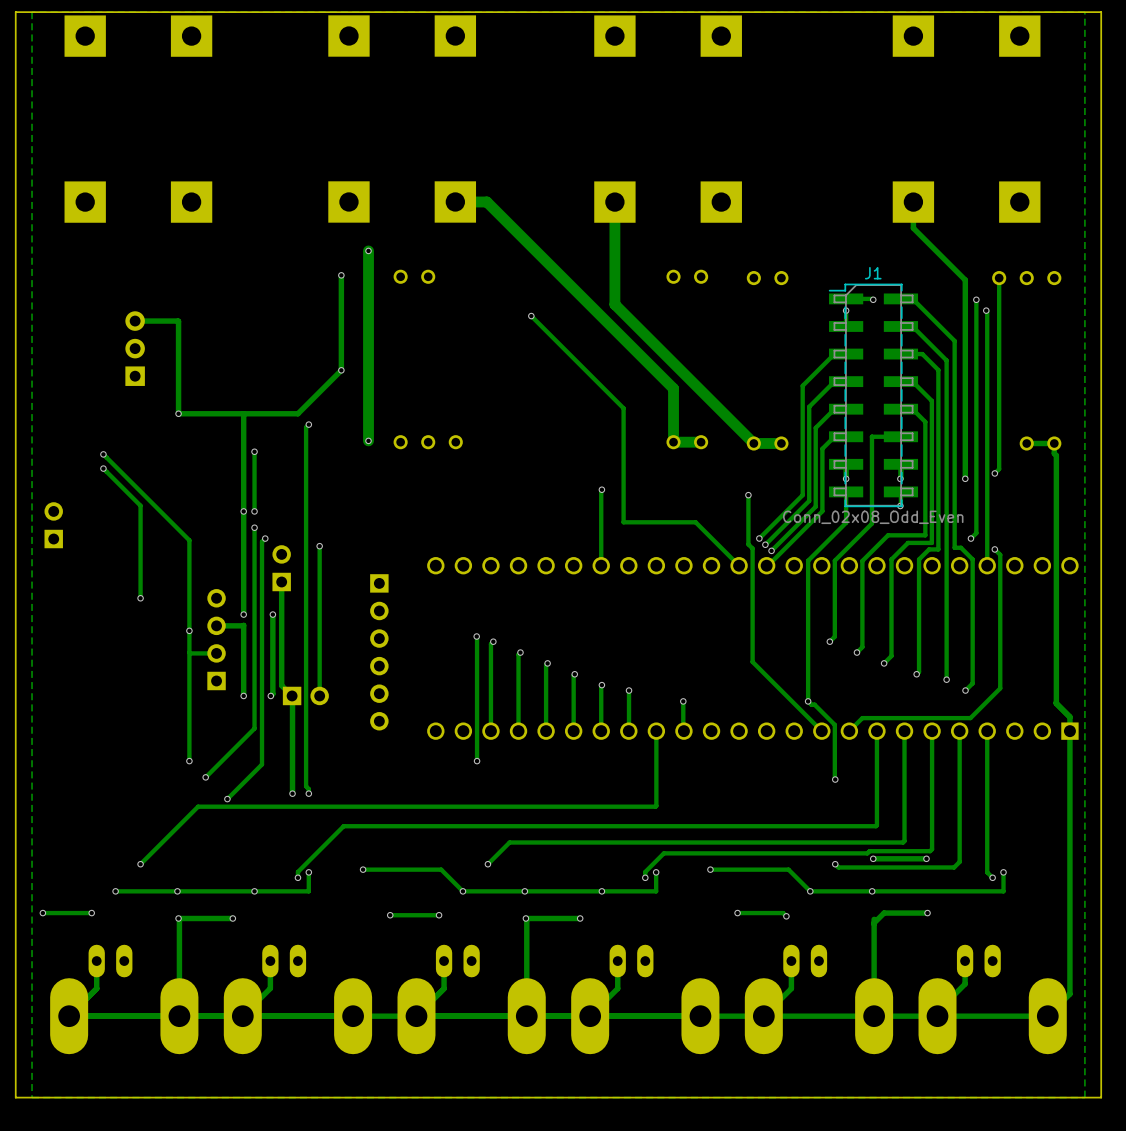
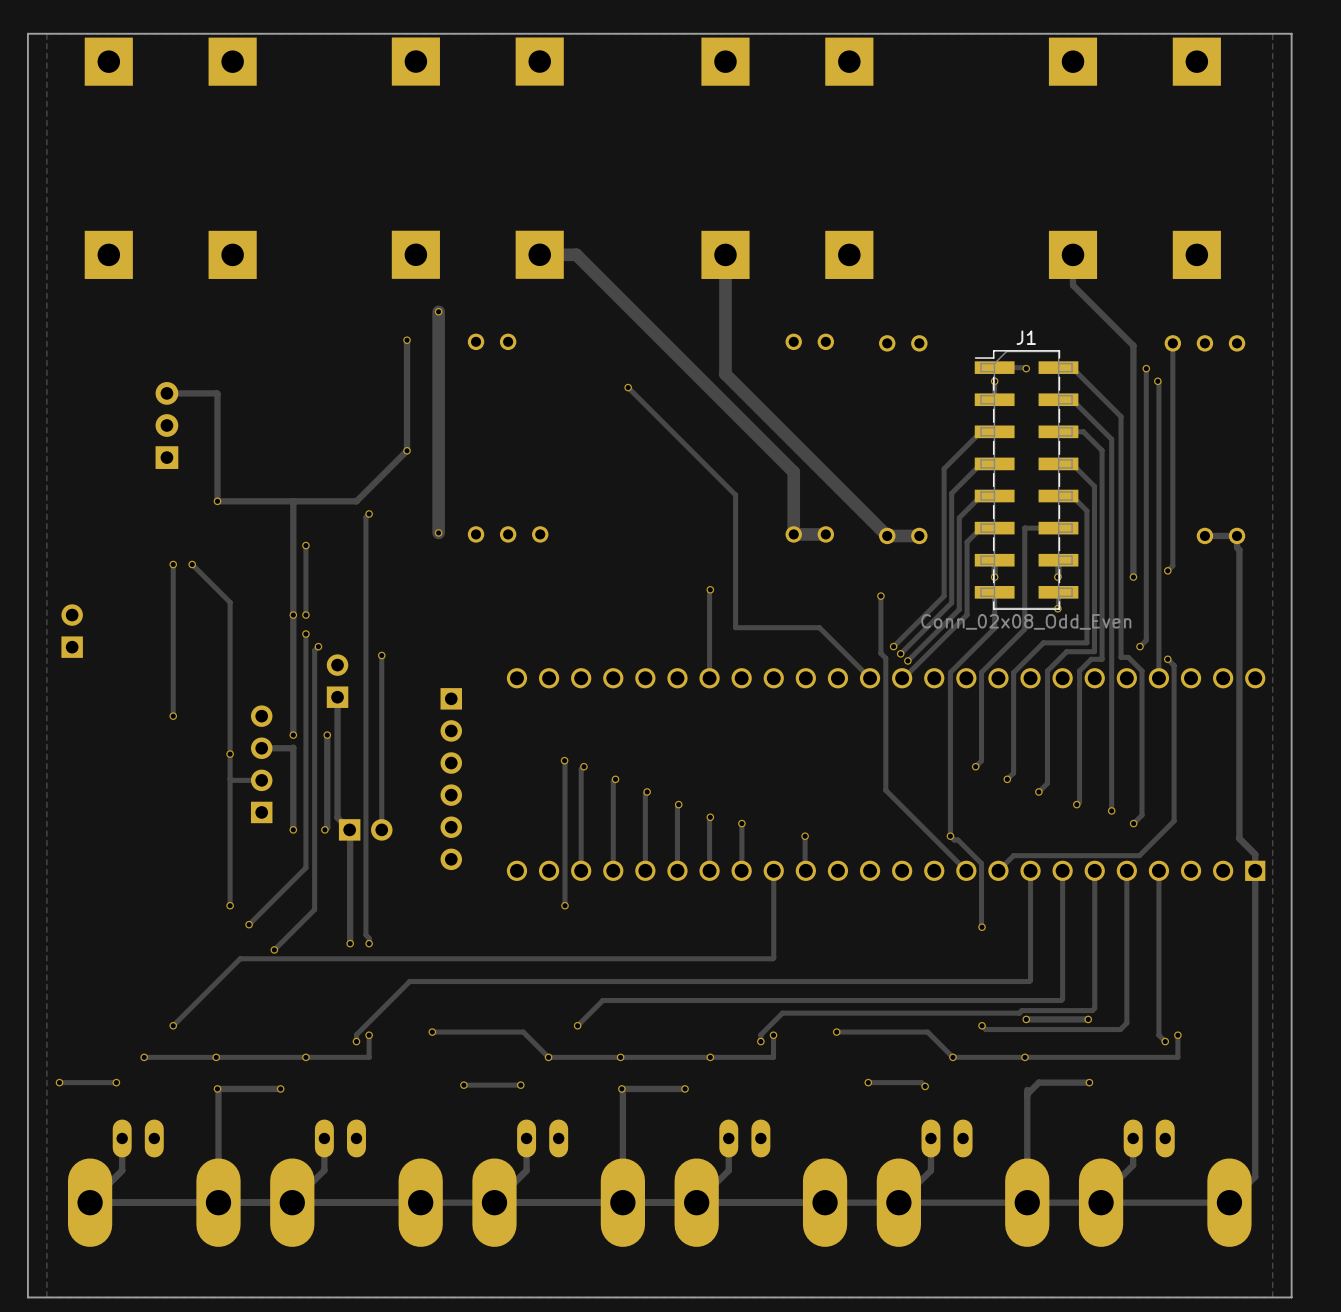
track: (103, 454) (189, 540) -> (192, 564) (230, 602) (230, 648)
via: (103, 454) -> none
track: (103, 468) (140, 505) -> (173, 564) (173, 608)
via: (103, 468) -> none
via: none -> (173, 564)
via: none -> (192, 564)

